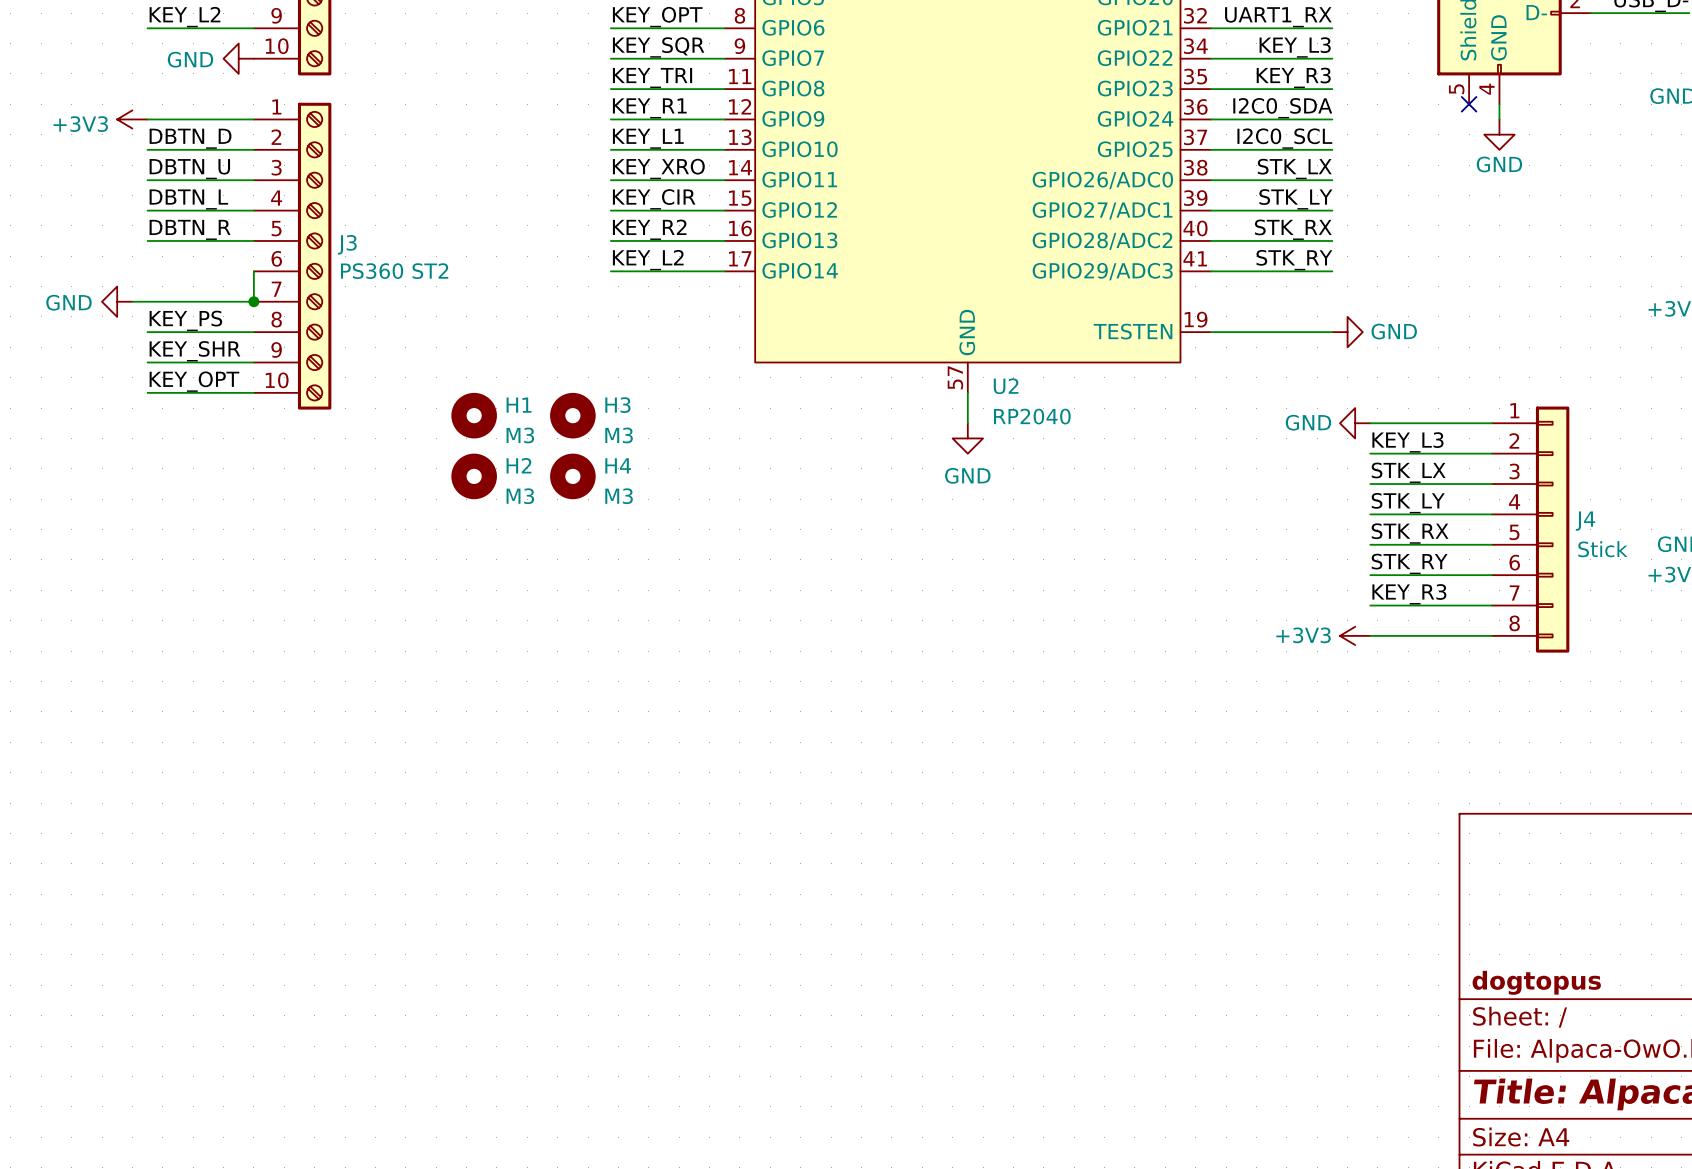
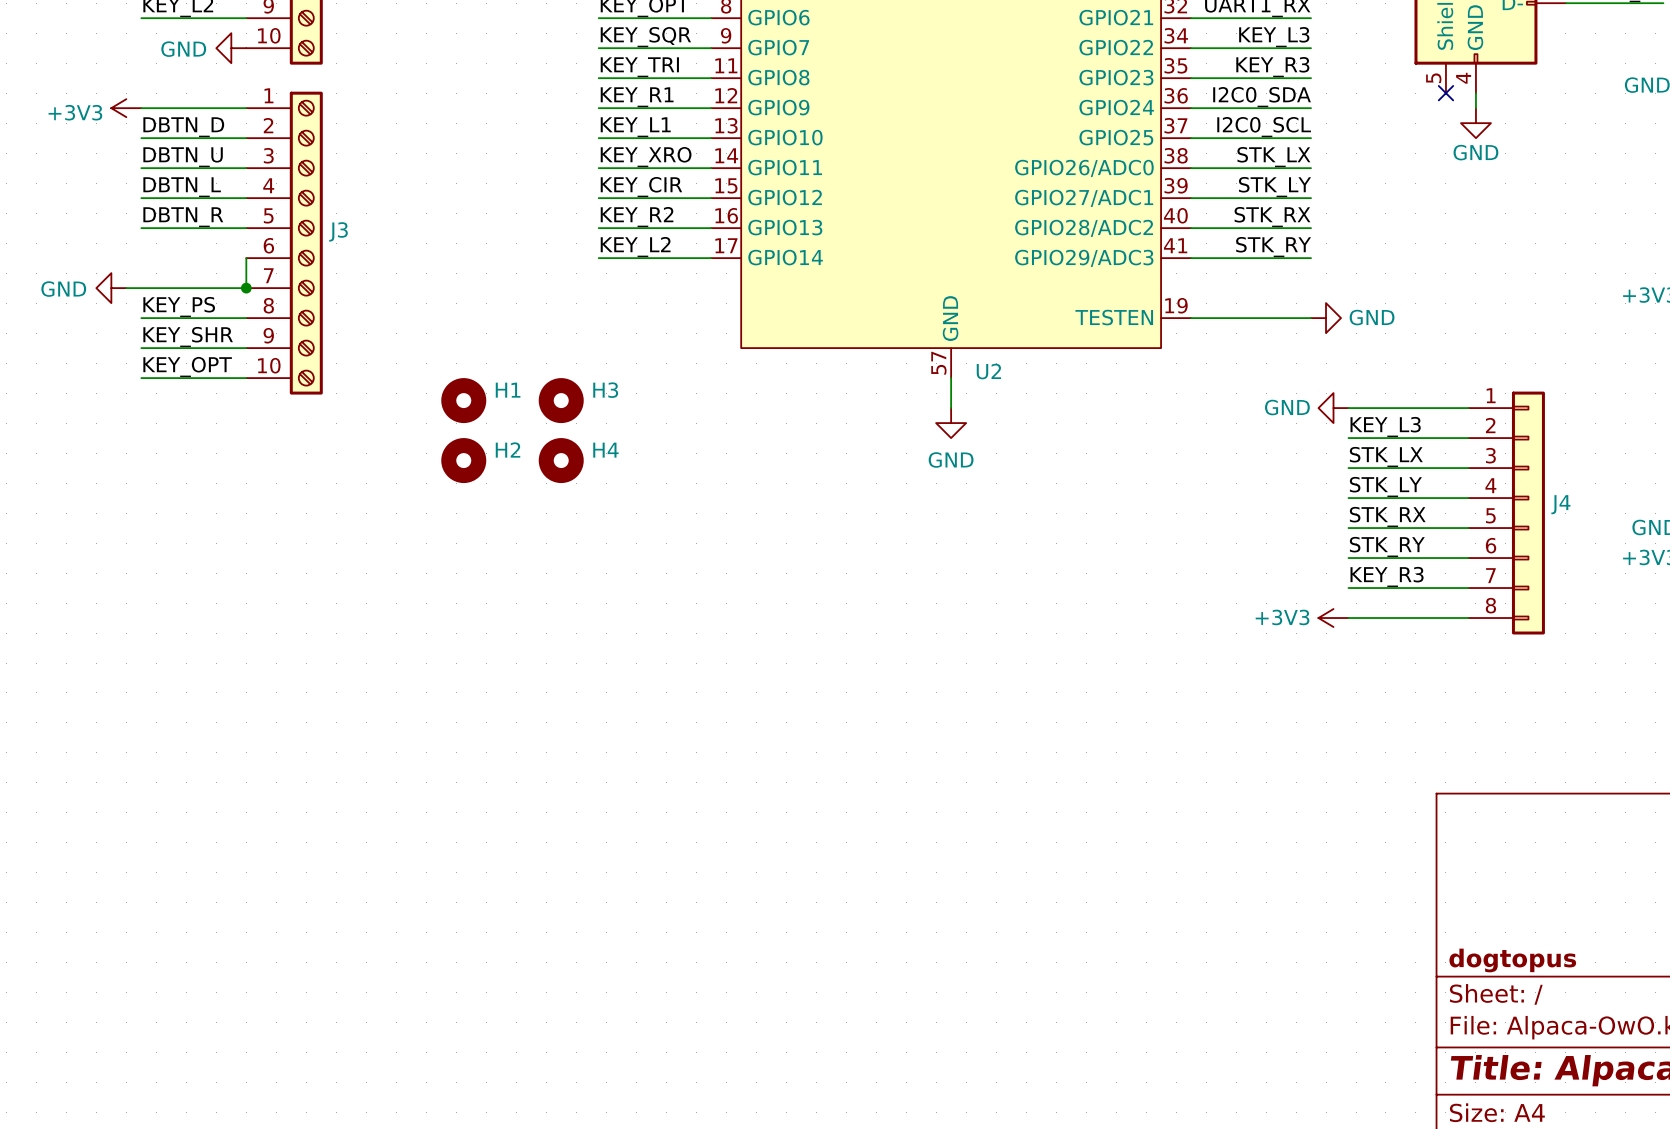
J3 value: PS360 ST2 (394, 271) -> none
U2 value: RP2040 (1032, 416) -> none
H1 value: M3 (520, 435) -> none
H3 value: M3 (619, 435) -> none
H2 value: M3 (520, 496) -> none
H4 value: M3 (619, 496) -> none
J4 value: Stick (1602, 549) -> none

